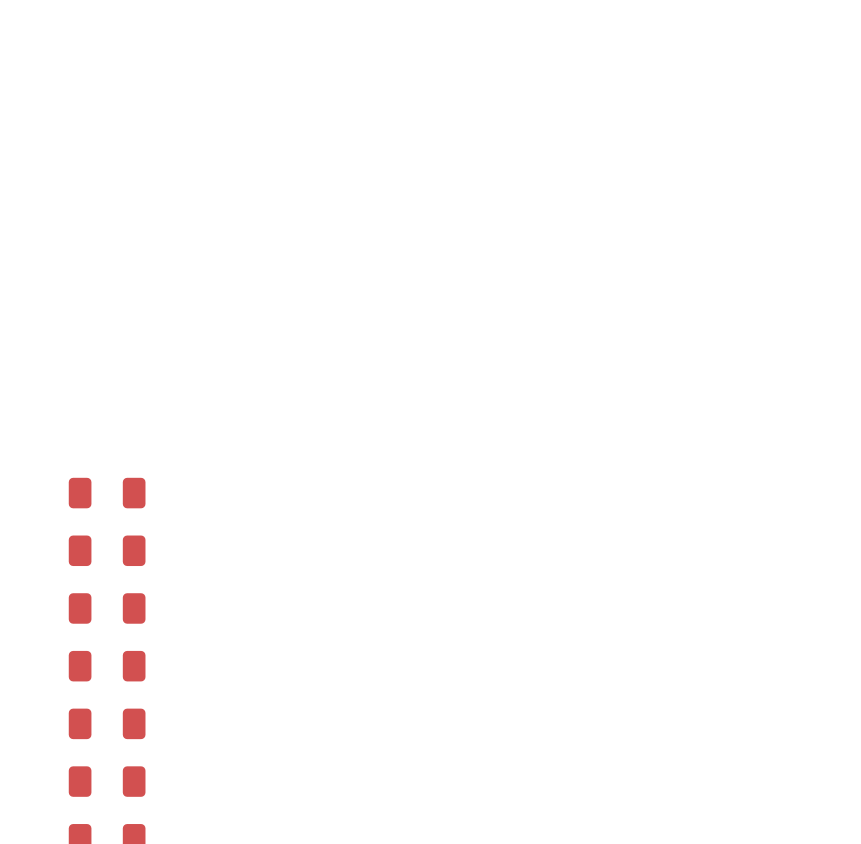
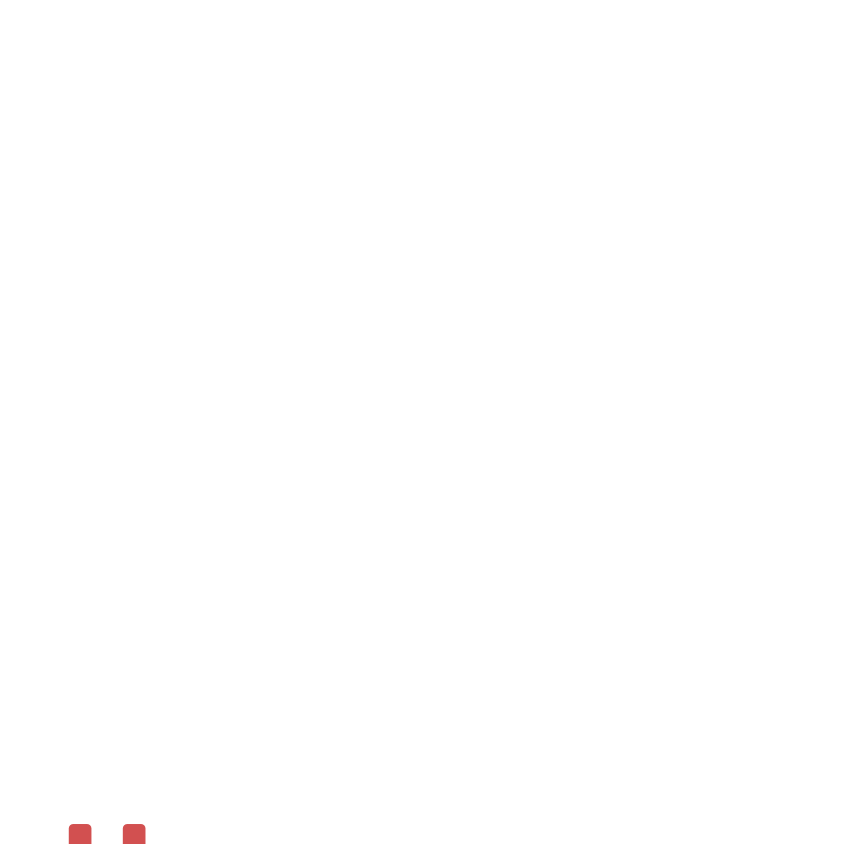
part: (107, 493) -> none
part: (107, 550) -> none
part: (107, 608) -> none
part: (107, 666) -> none
part: (107, 723) -> none
part: (107, 781) -> none

